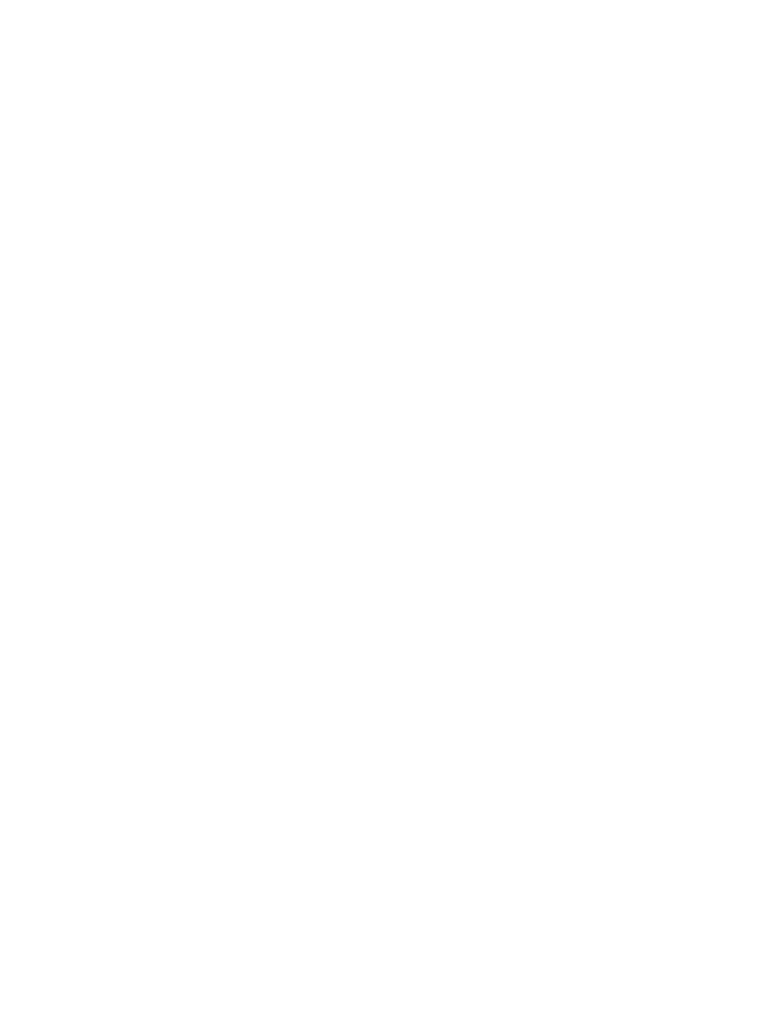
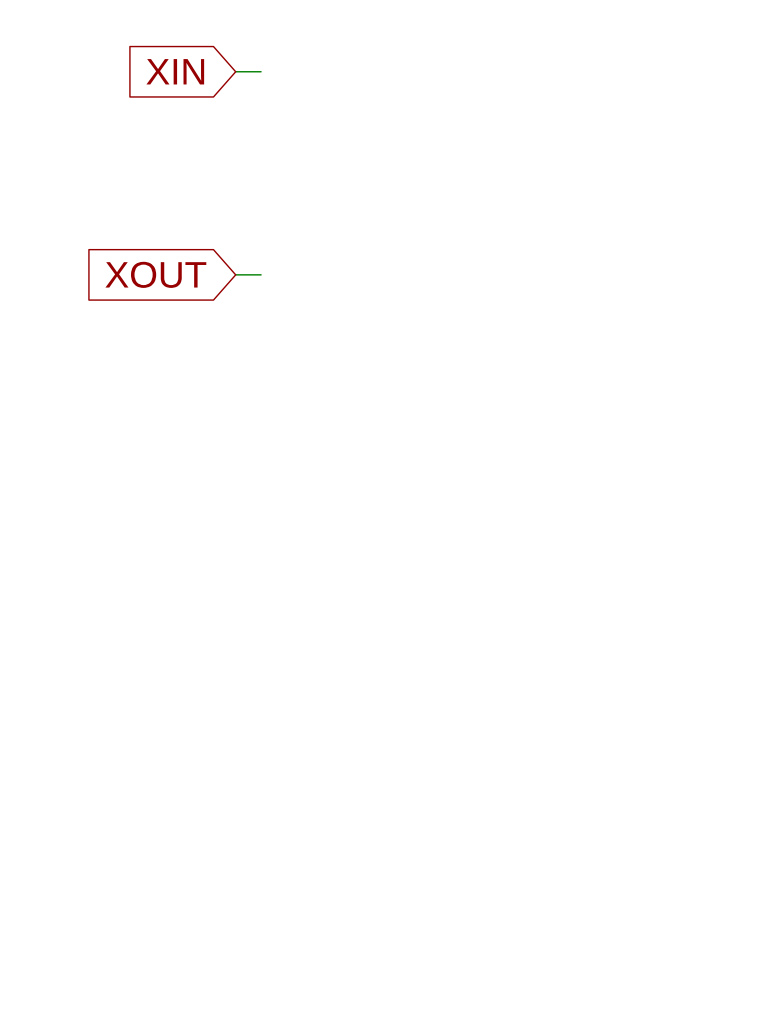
global label: none -> XIN (175, 71)
wire: none -> (235, 71) (261, 71)
global label: none -> XOUT (155, 274)
wire: none -> (235, 274) (261, 274)

